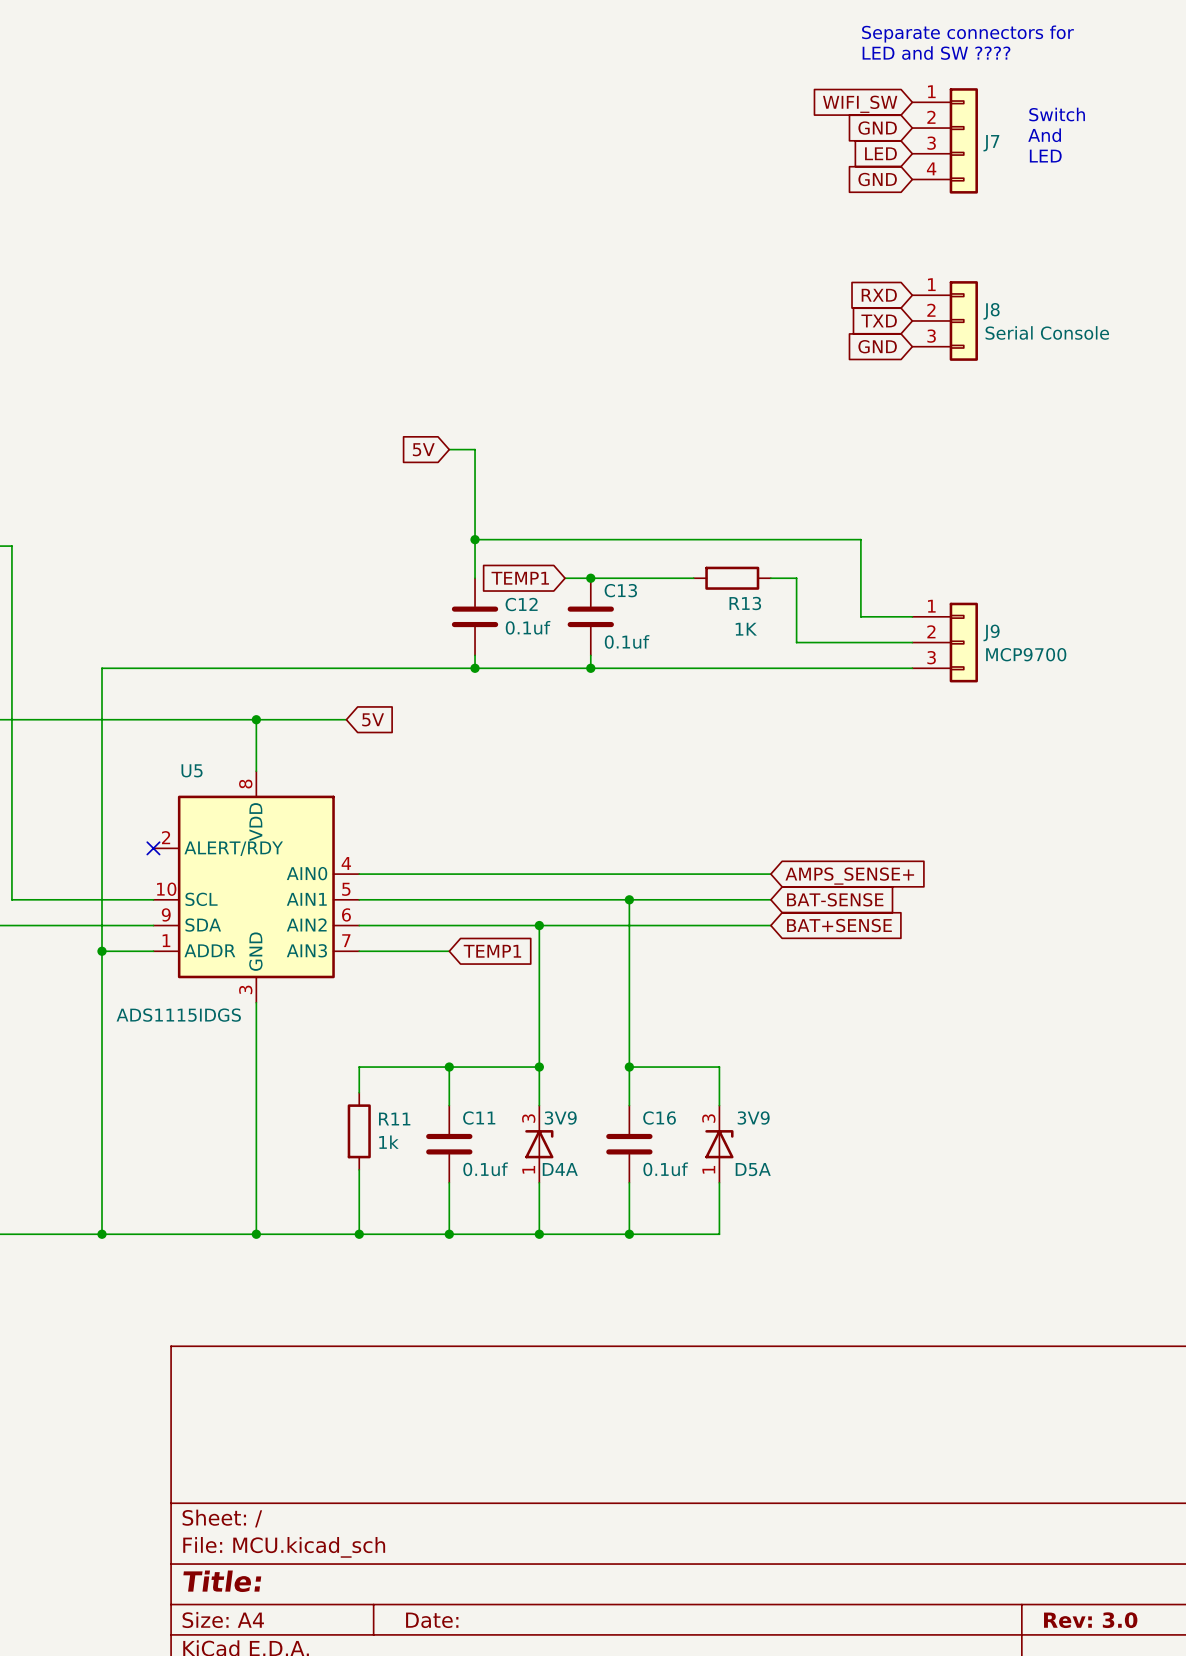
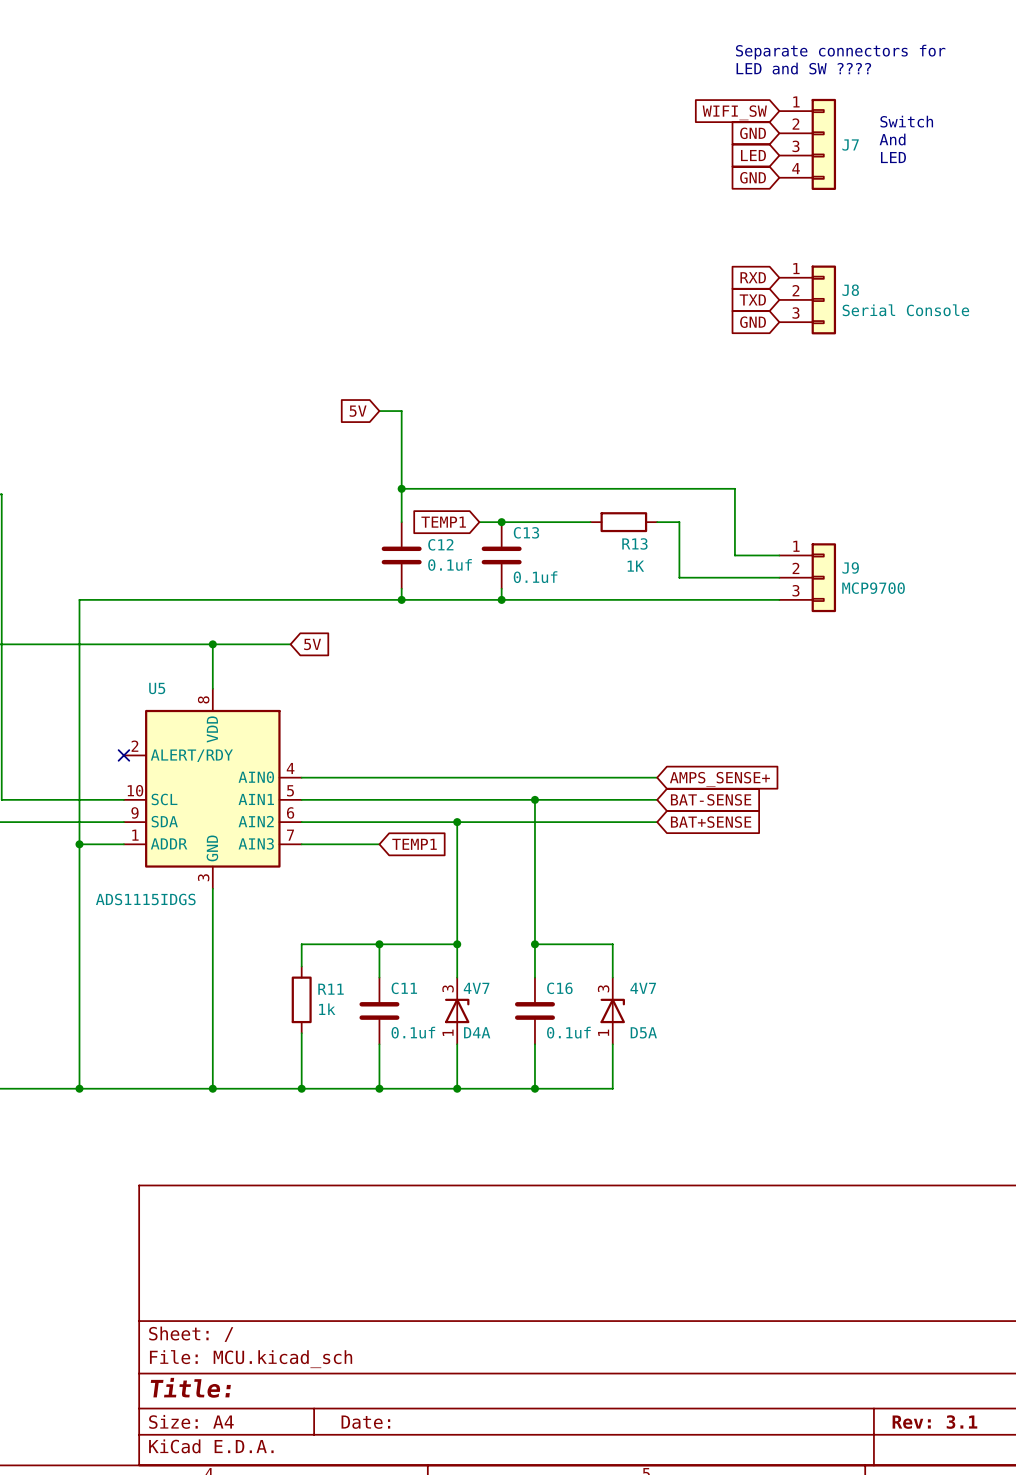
D4A value: 3V9 (560, 1118) -> 4V7 (476, 988)
D5A value: 3V9 (753, 1118) -> 4V7 (643, 988)
title block: Rev: 3.0 (1090, 1620) -> Rev: 3.1 (934, 1422)

